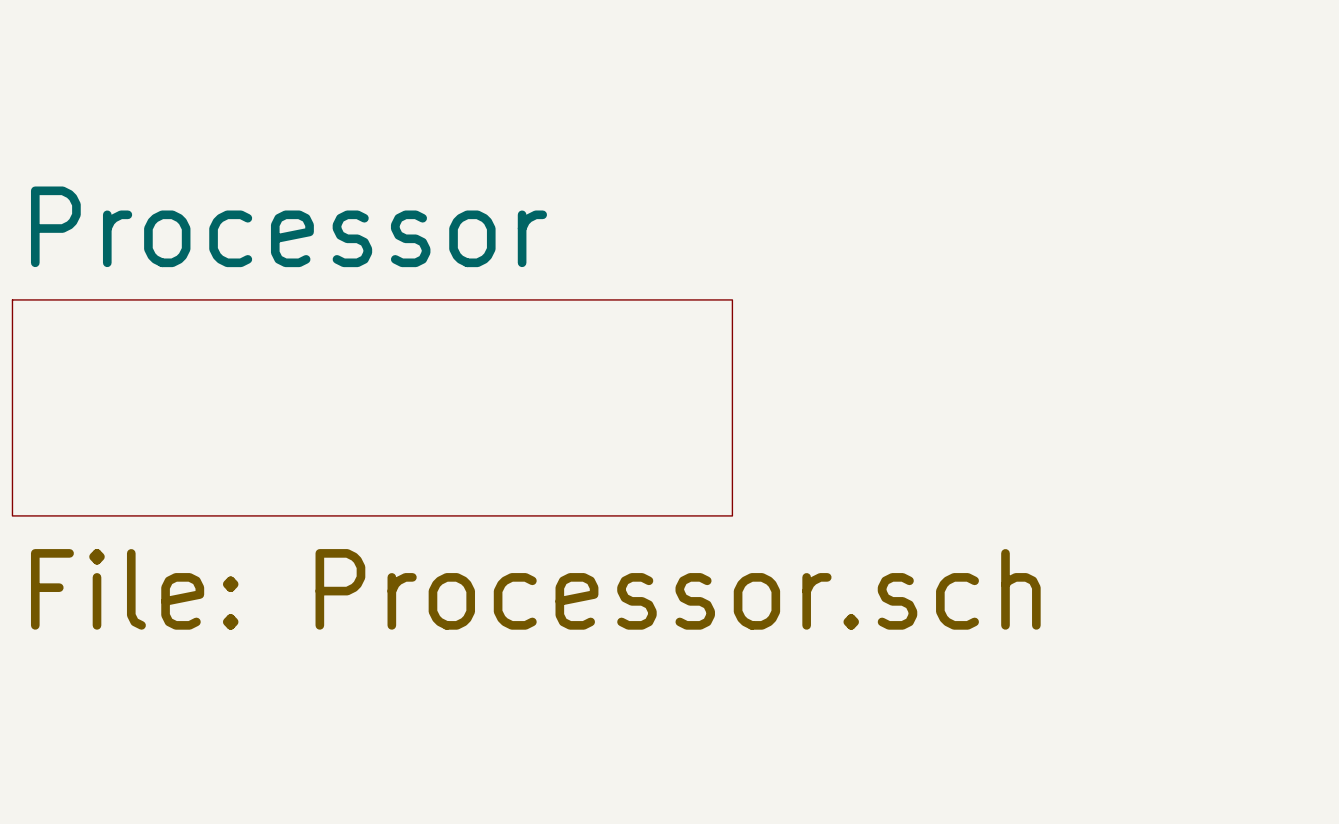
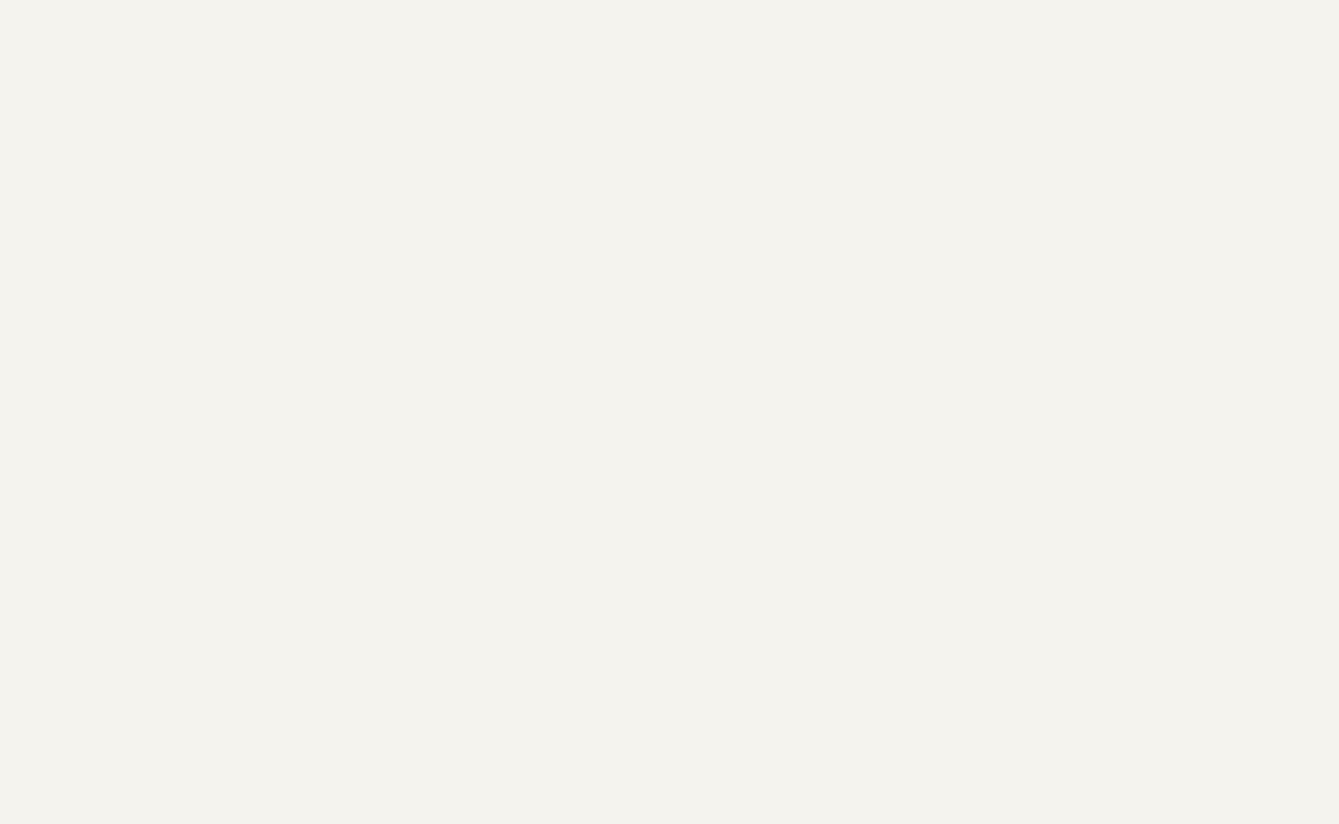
sheet Processor: File: Processor.sch (372, 407) -> none

